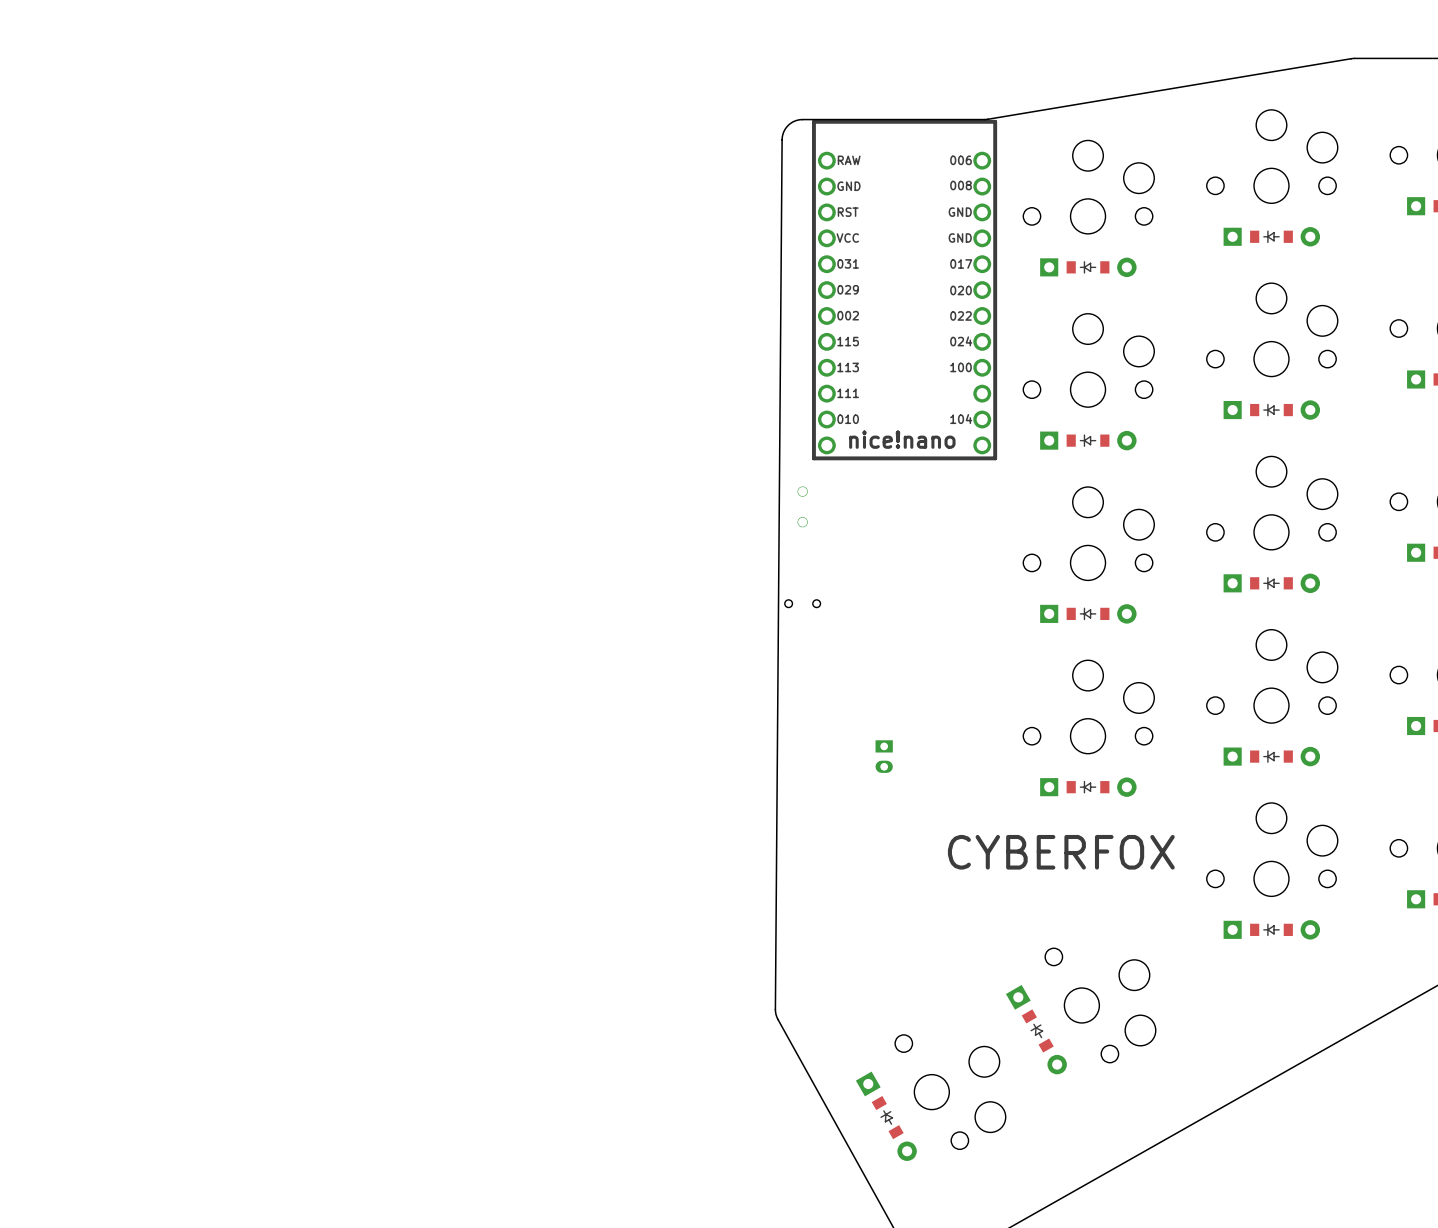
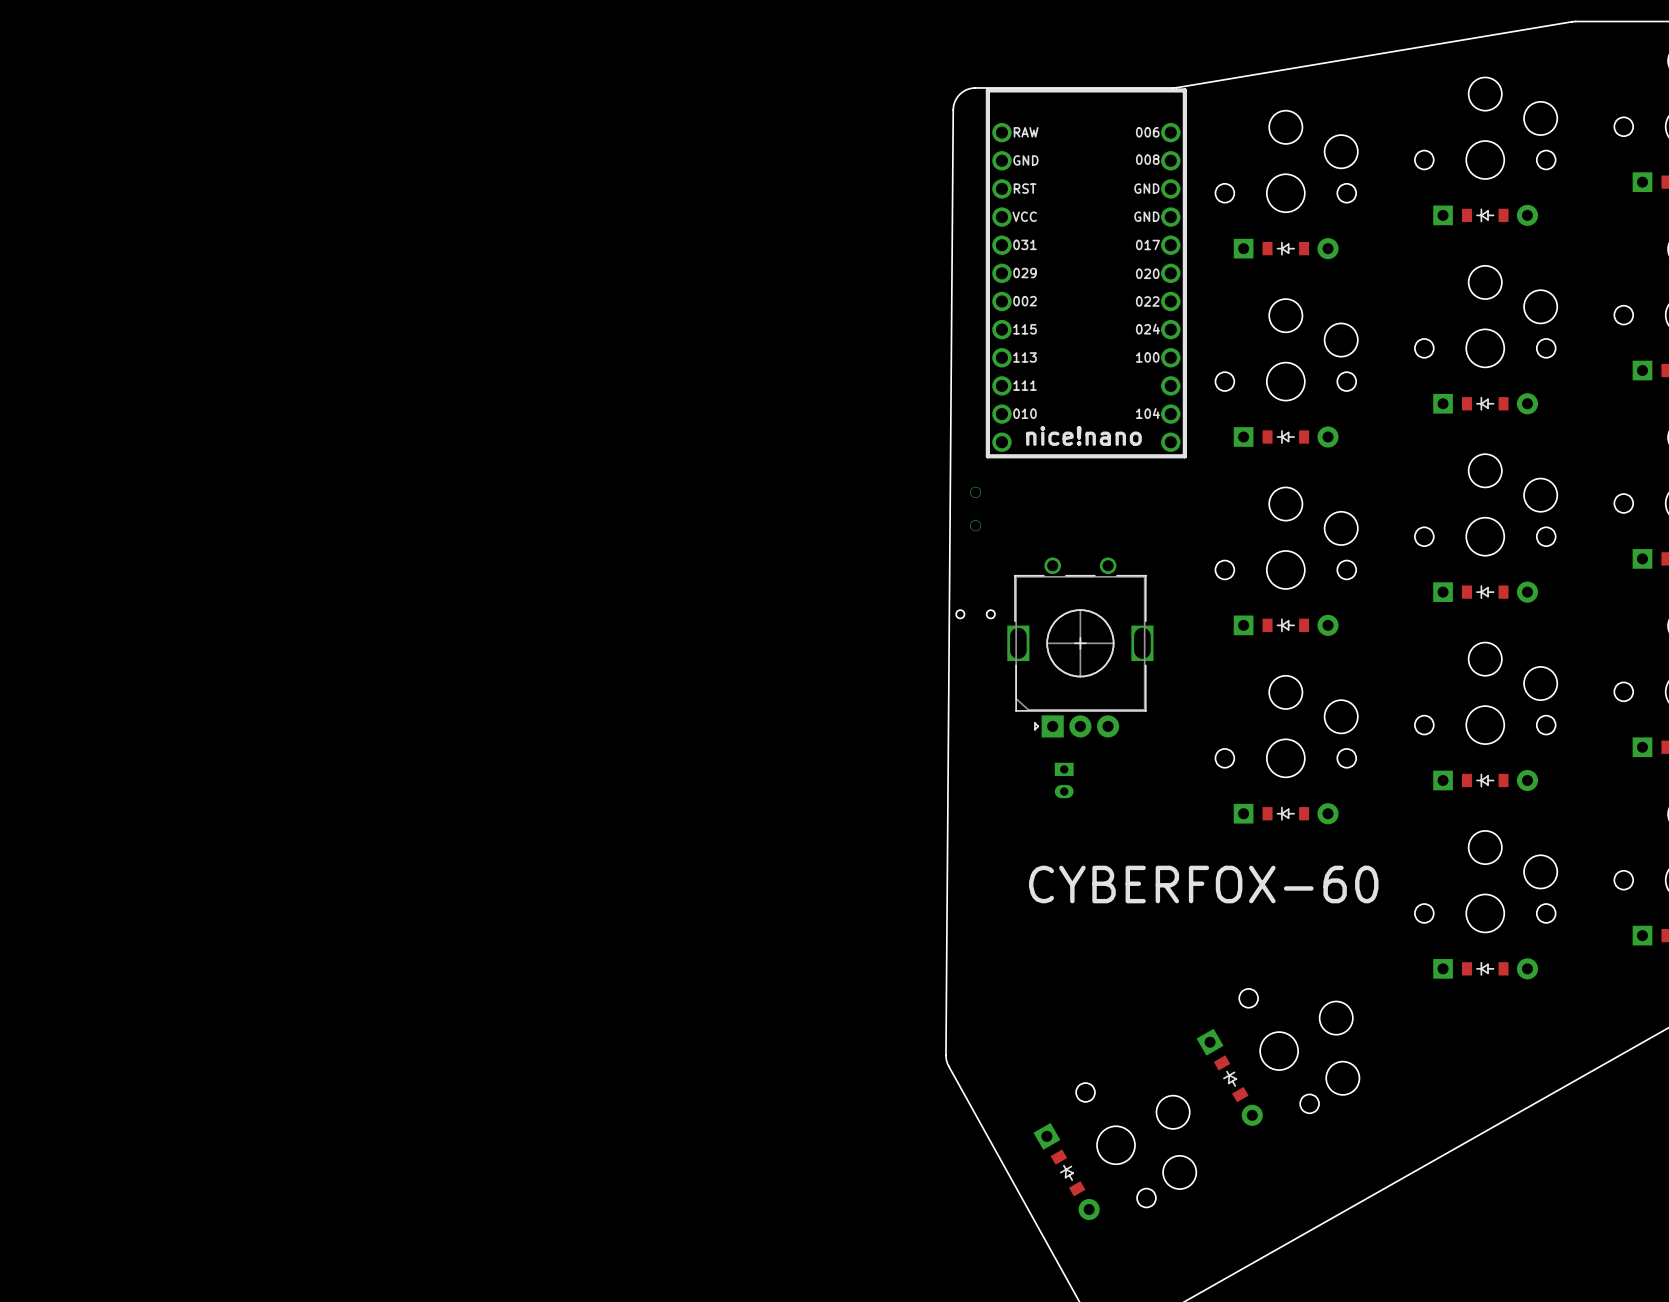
part: none -> (1080, 647)
text: CYBERFOX (1061, 852) -> CYBERFOX-60 (1203, 884)

